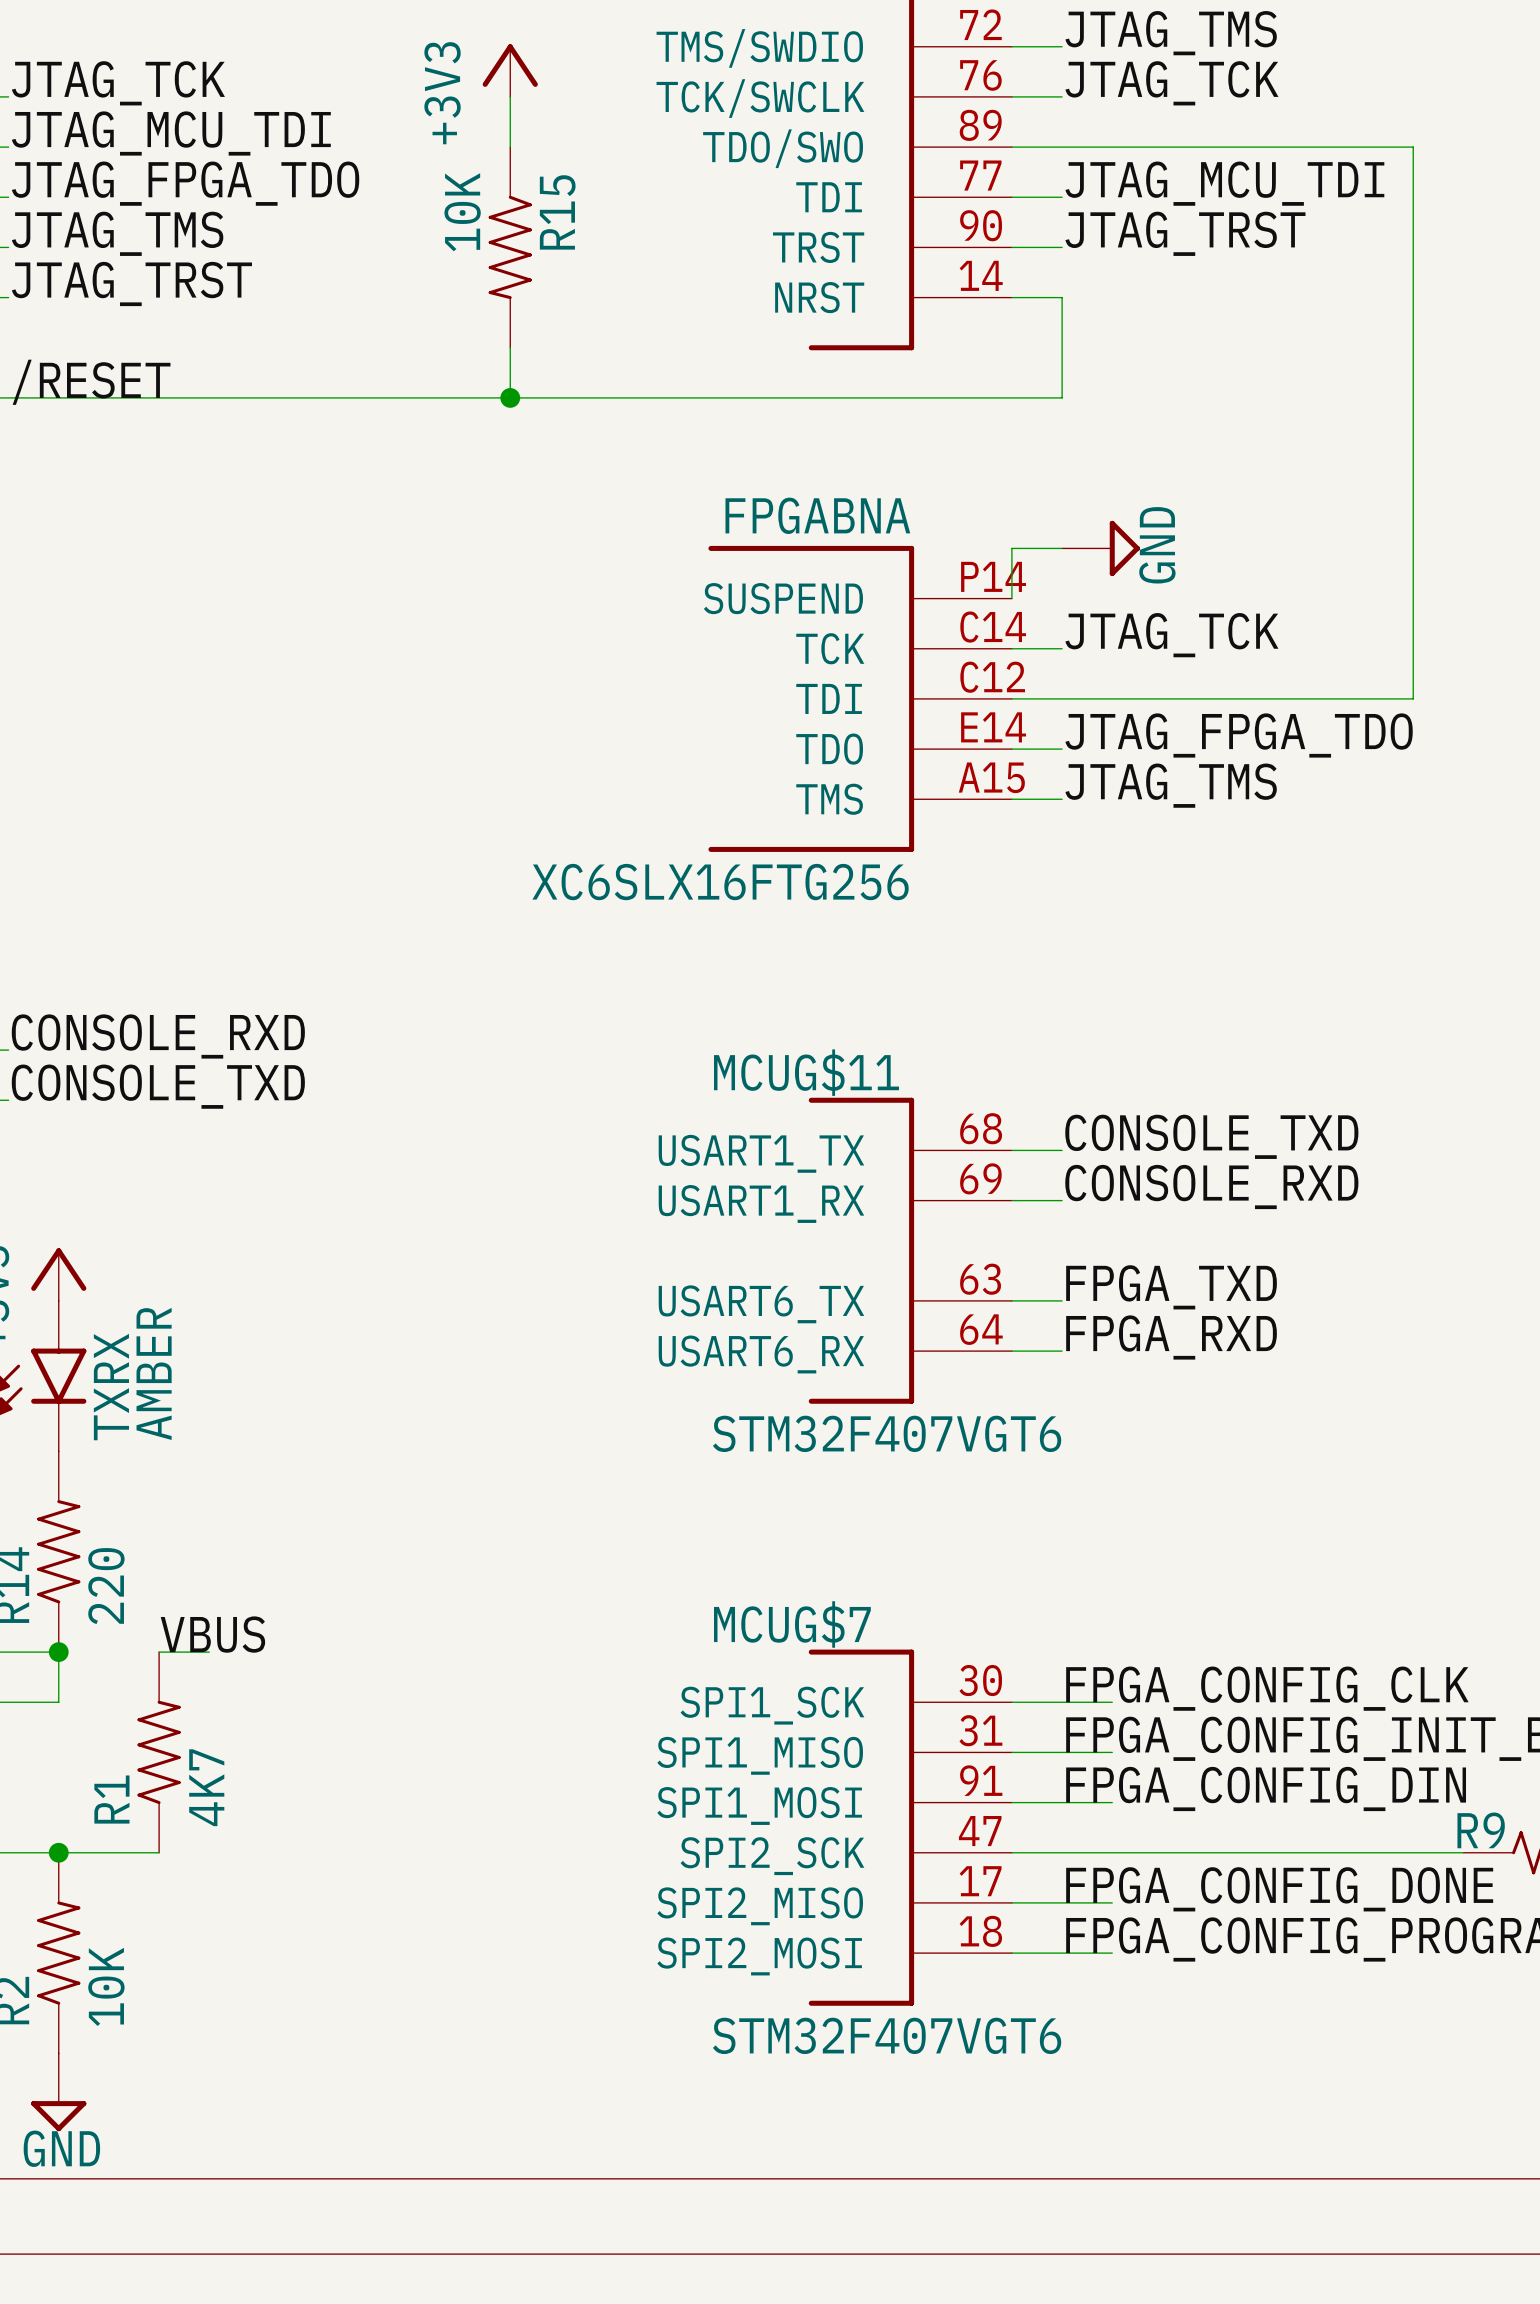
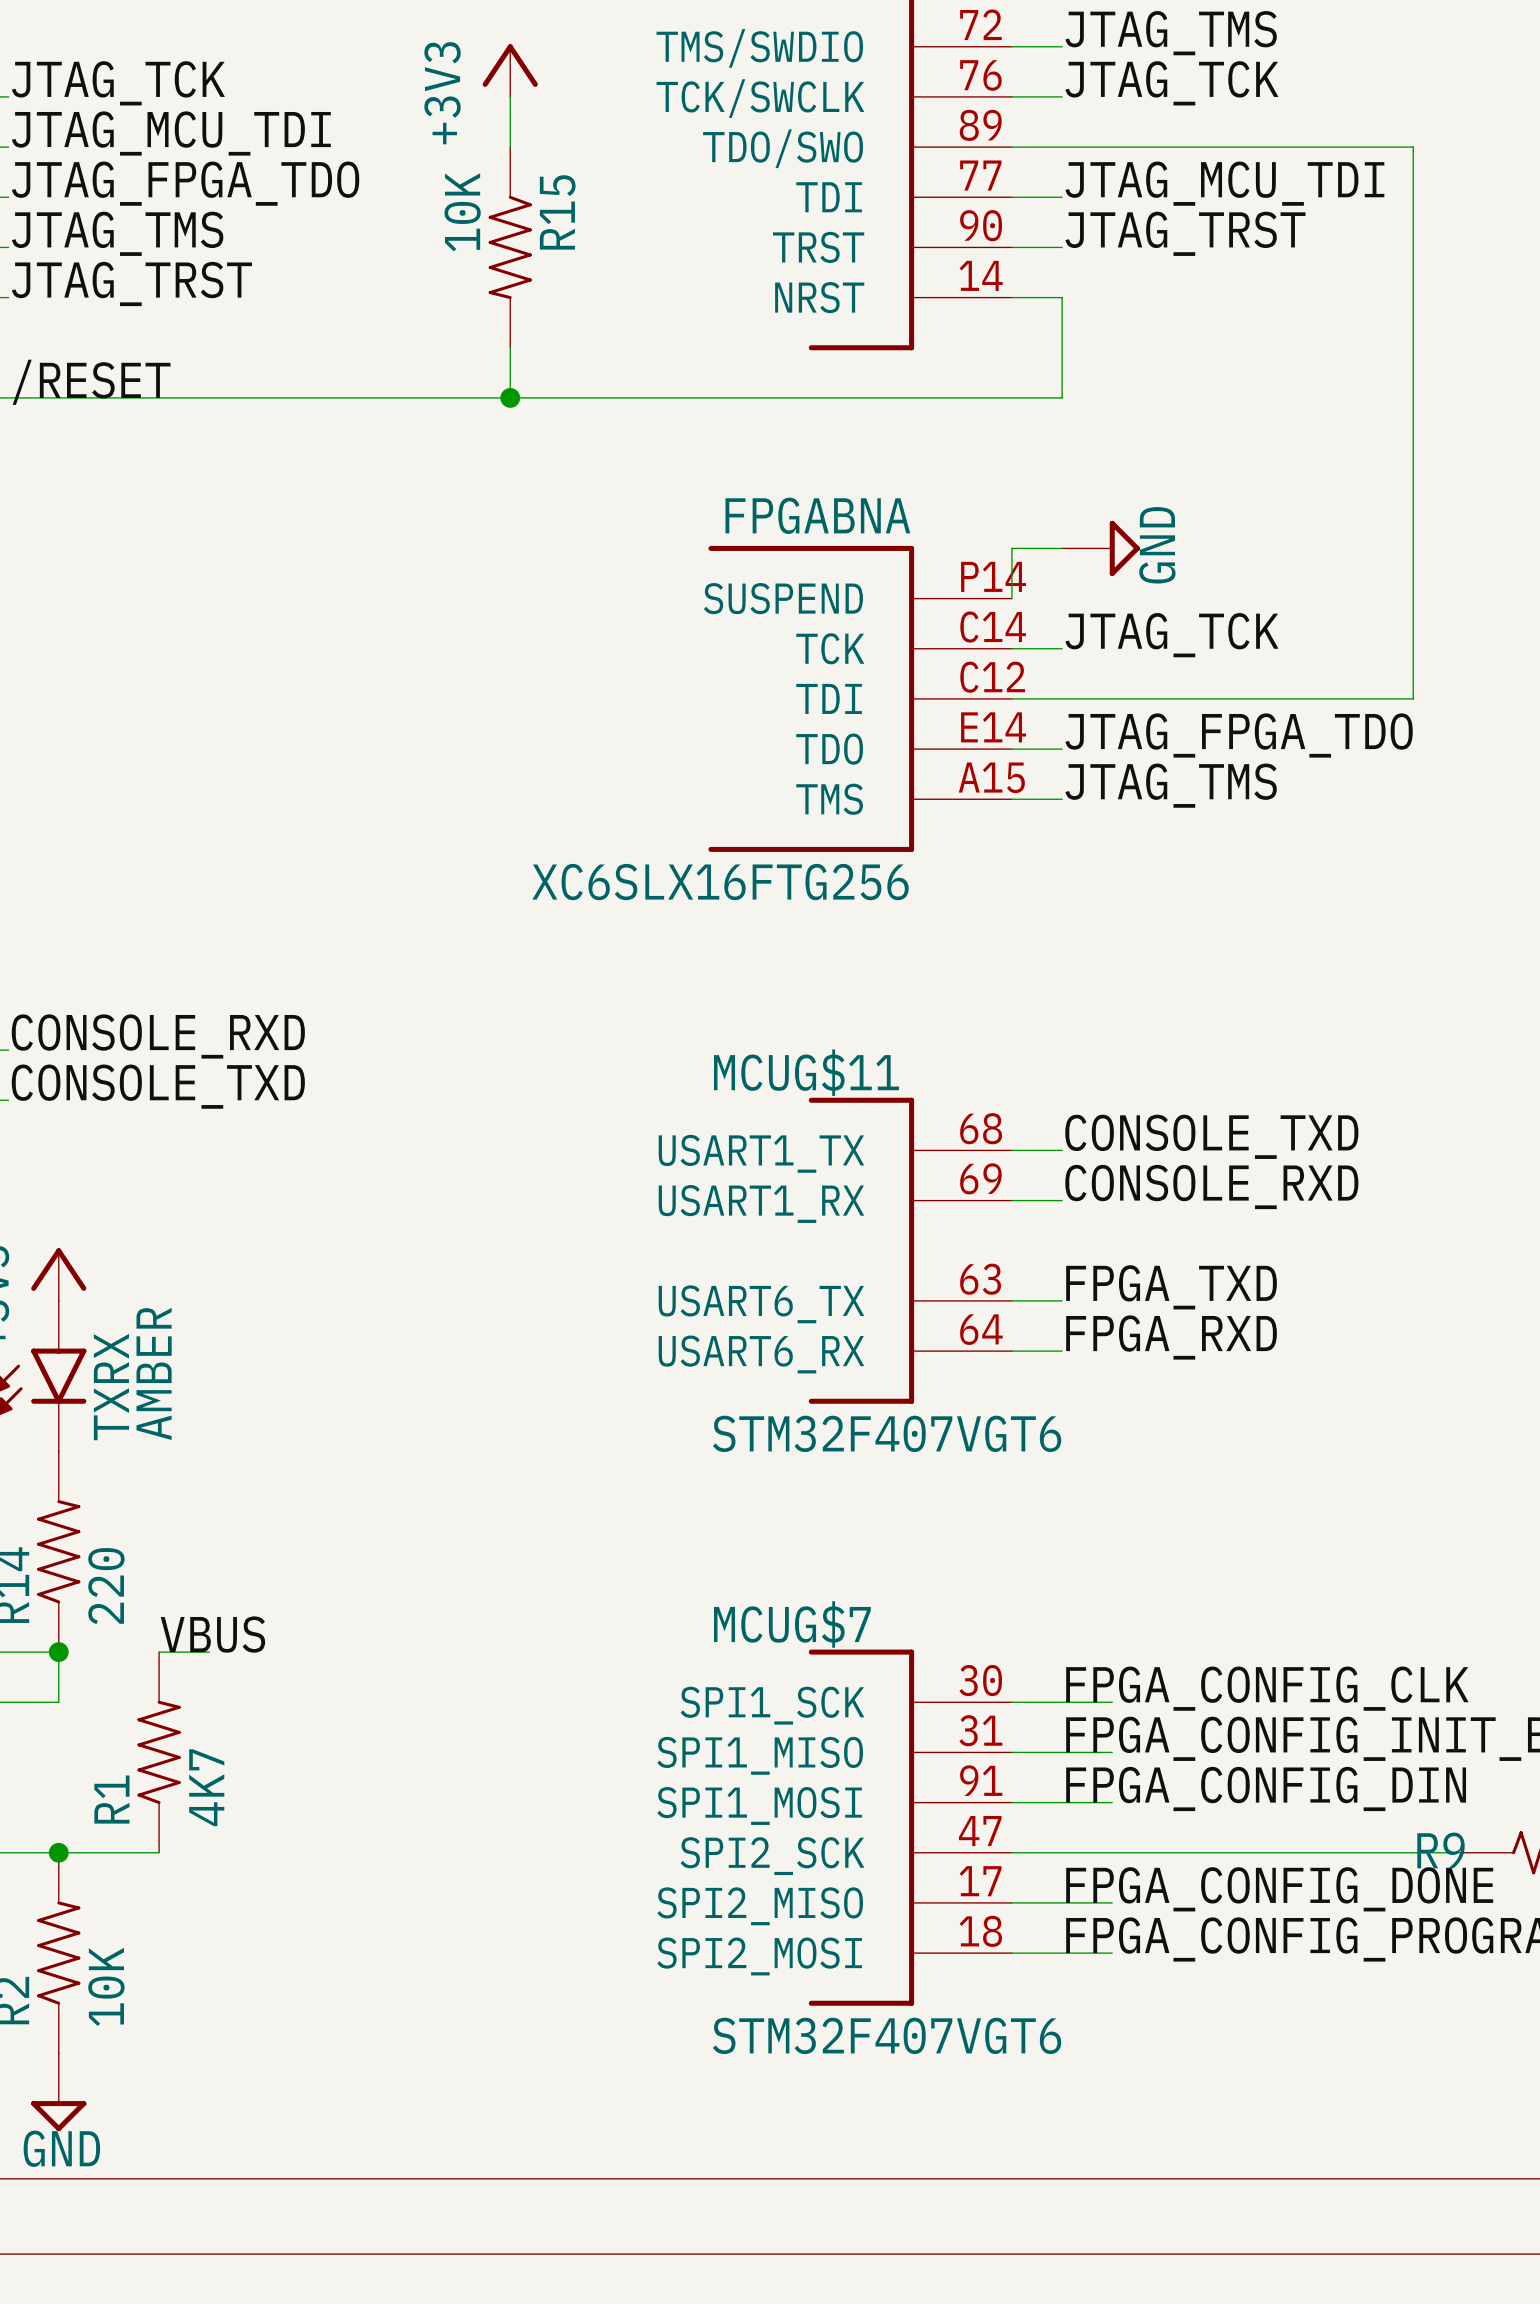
R9 name position: R9 (1481, 1830) -> R9 (1441, 1850)

